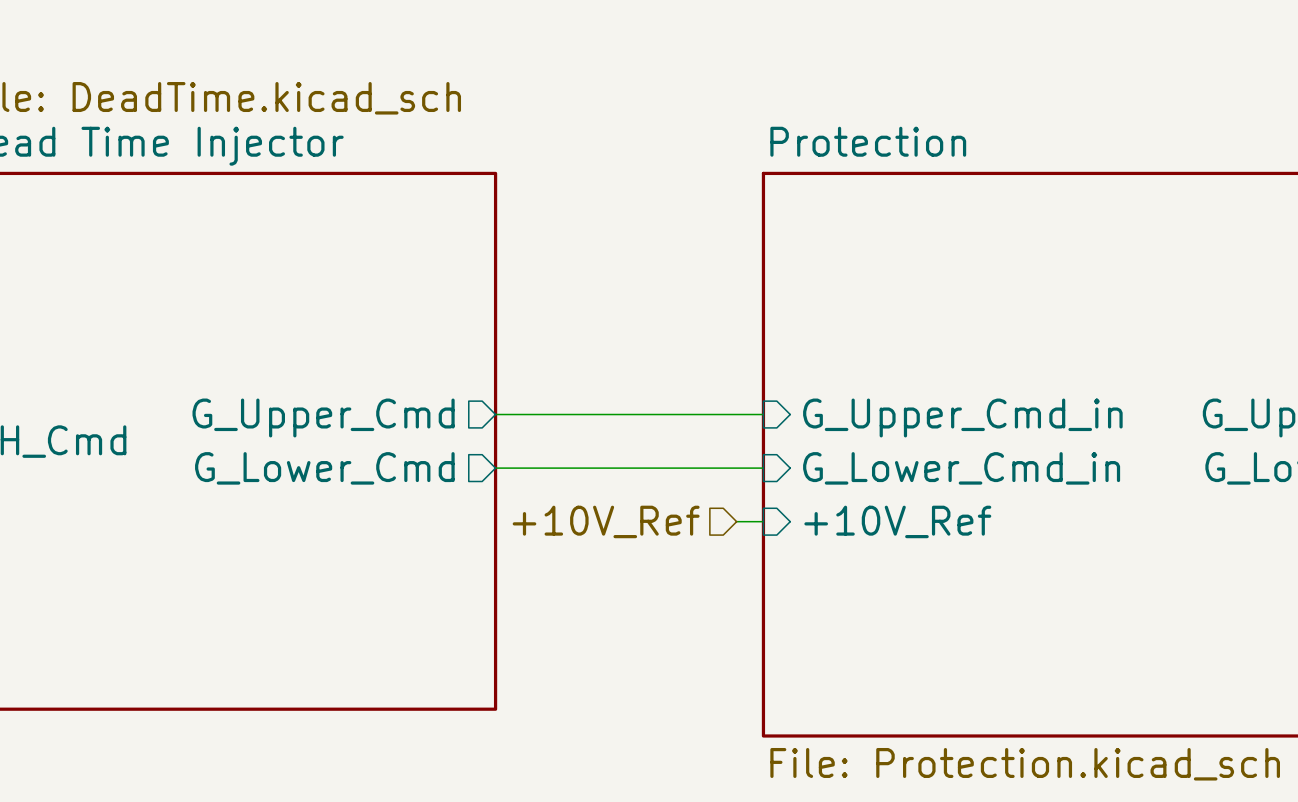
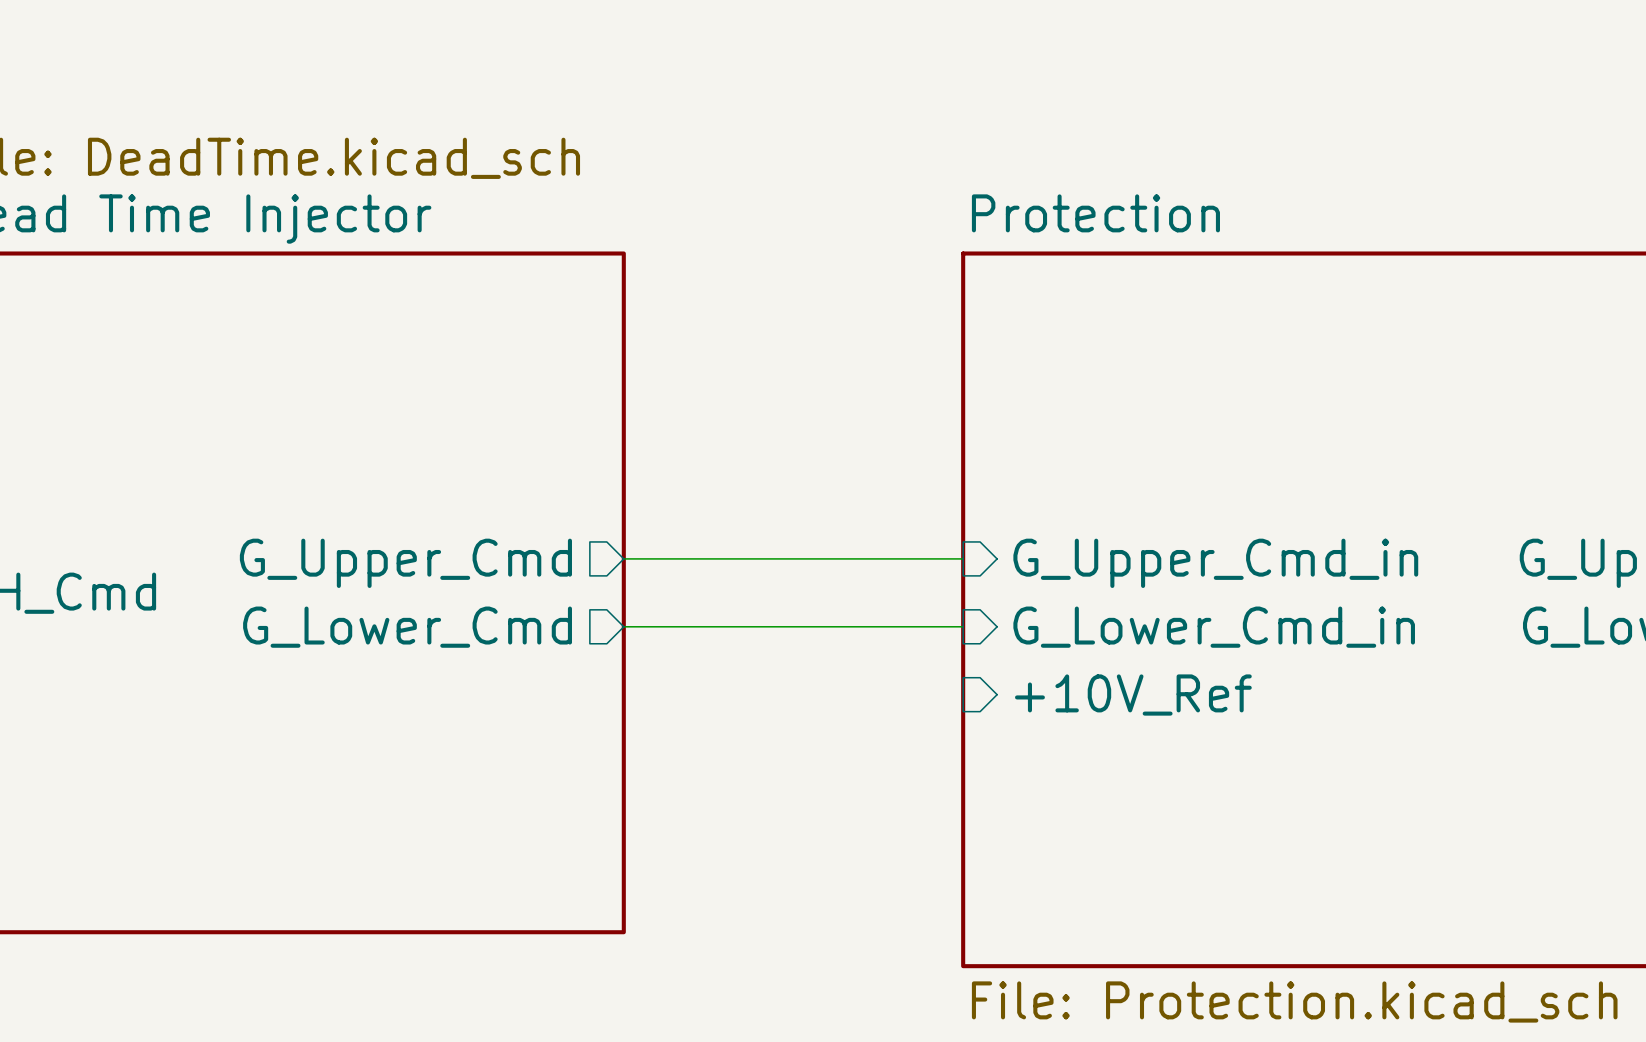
hierarchical label: +10V_Ref (606, 521) -> none
wire: (736, 521) (763, 521) -> none

